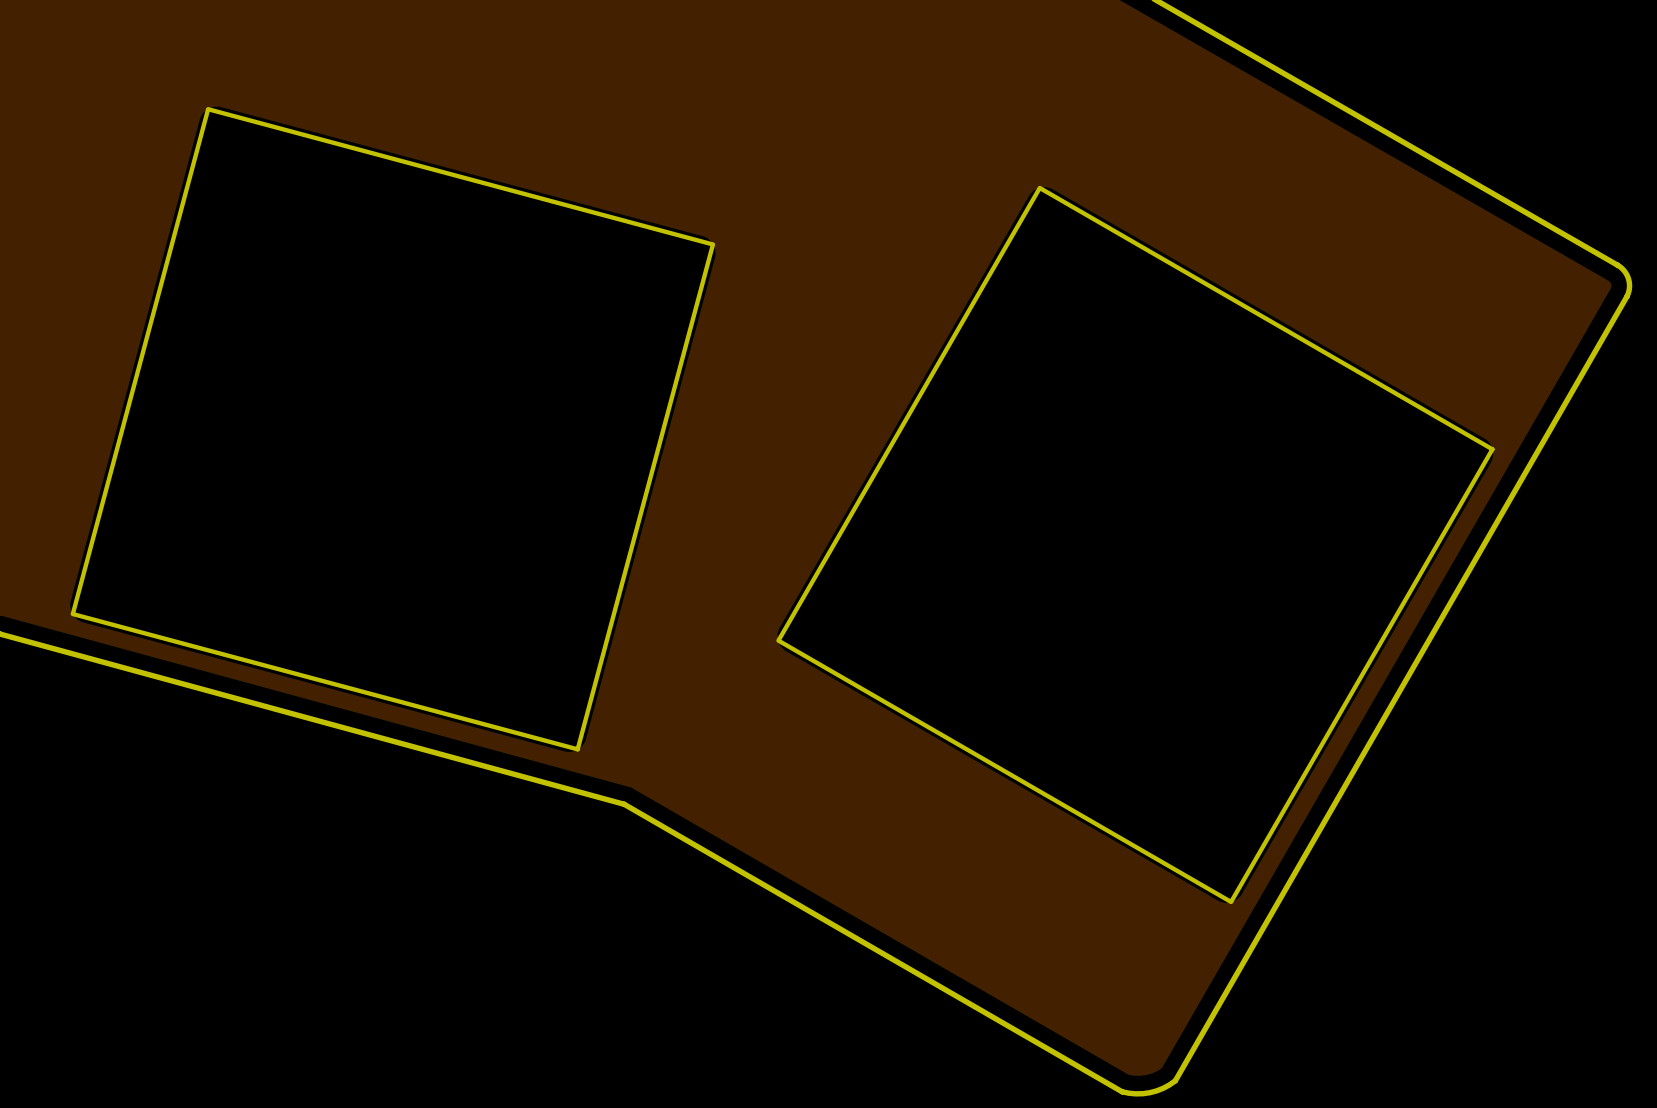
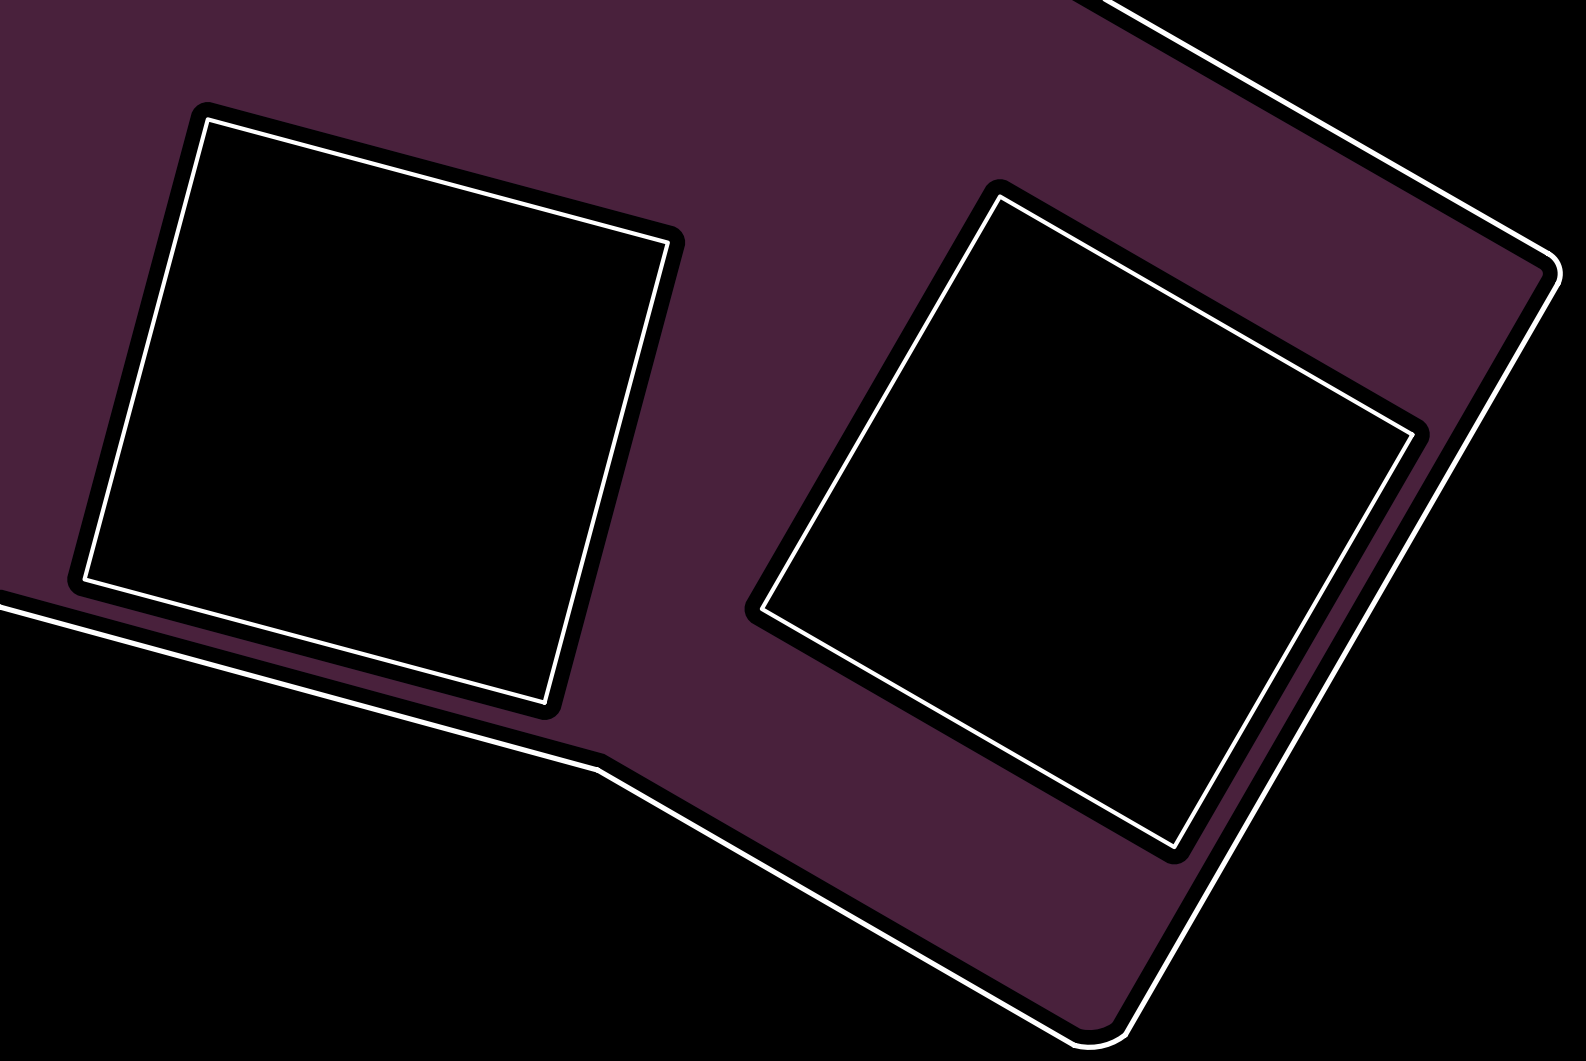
drawing shape: [70, 107, 716, 752] -> [82, 117, 670, 705]
drawing shape: [776, 185, 1495, 905] -> [759, 194, 1415, 850]

